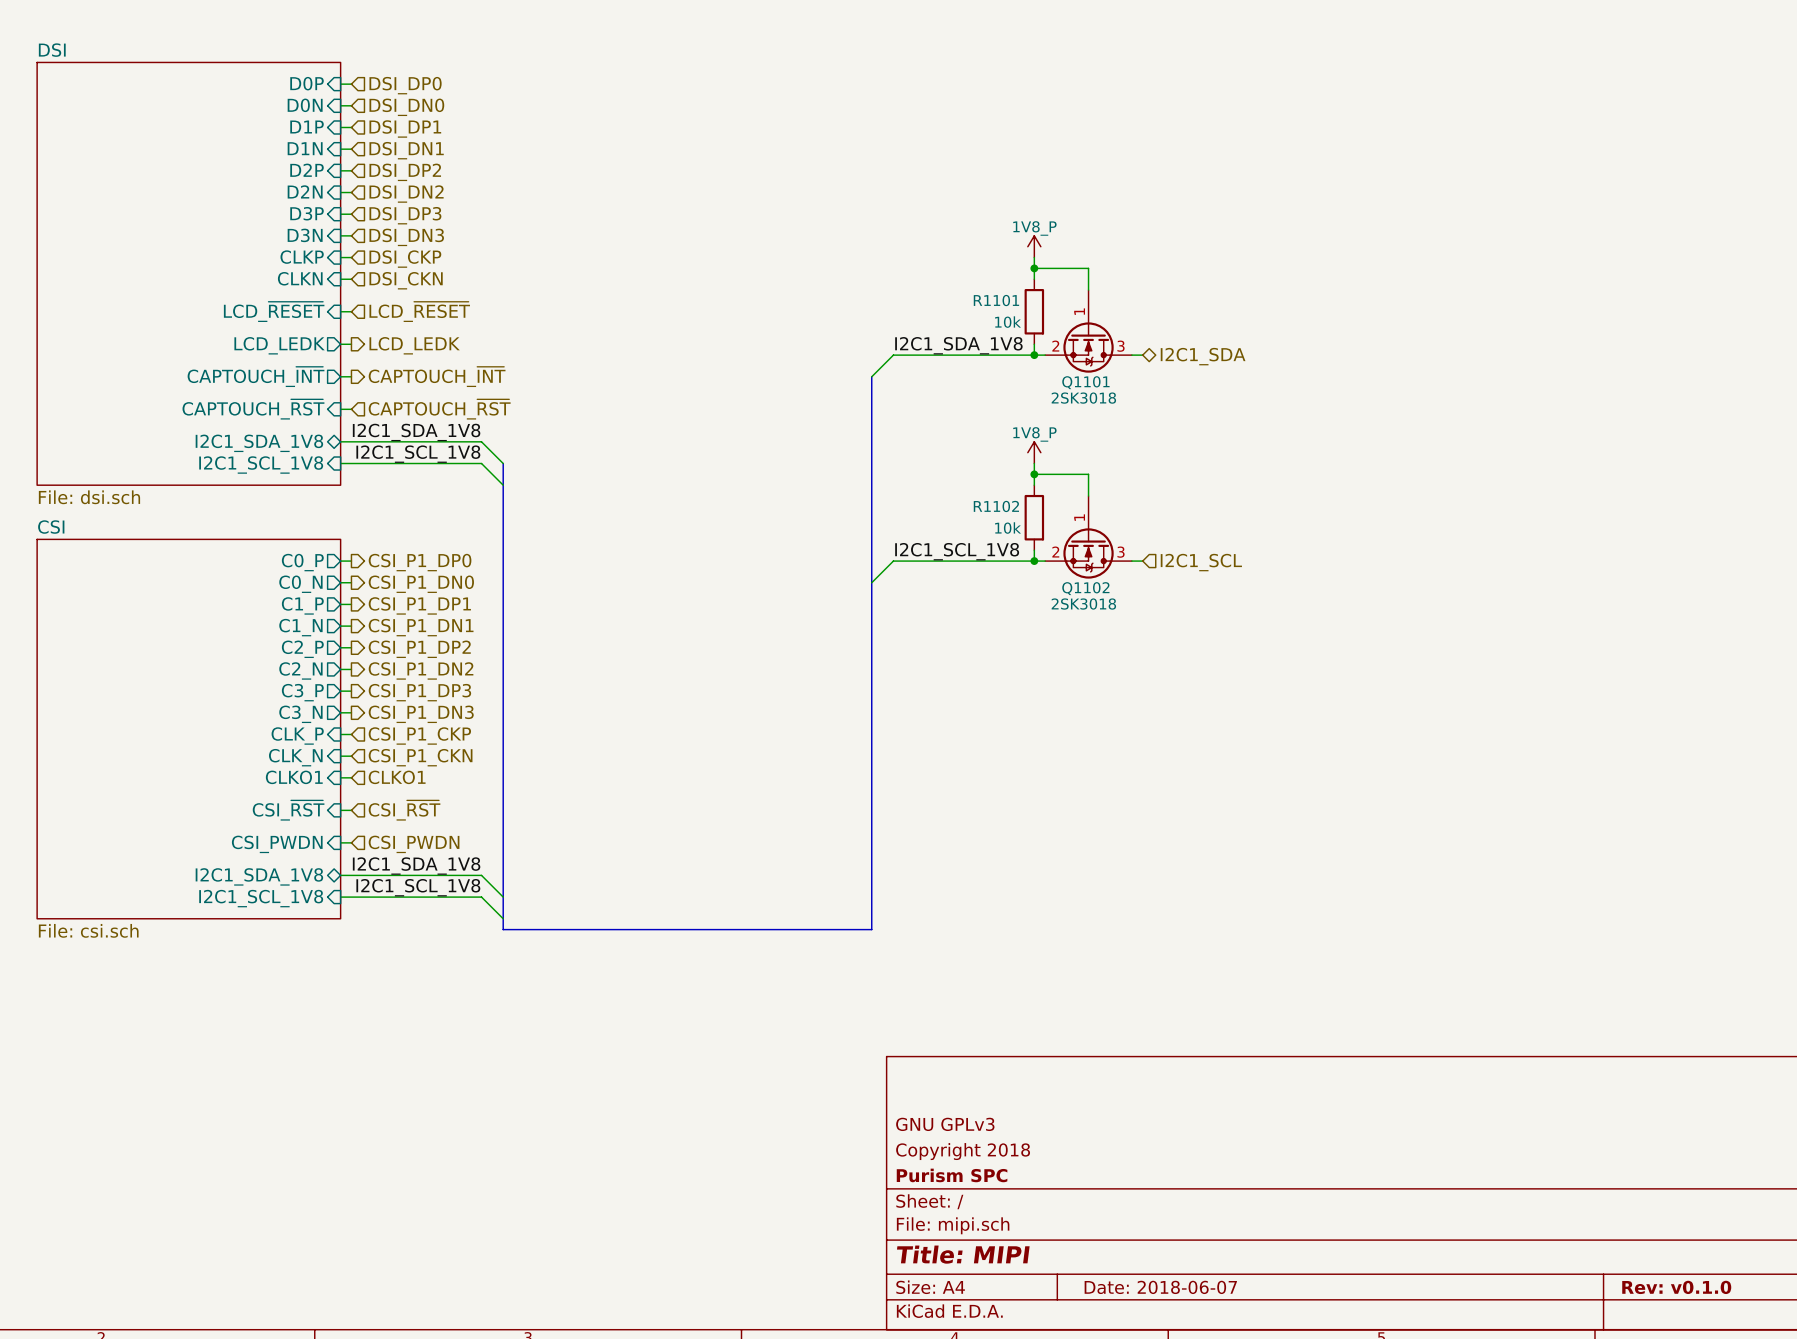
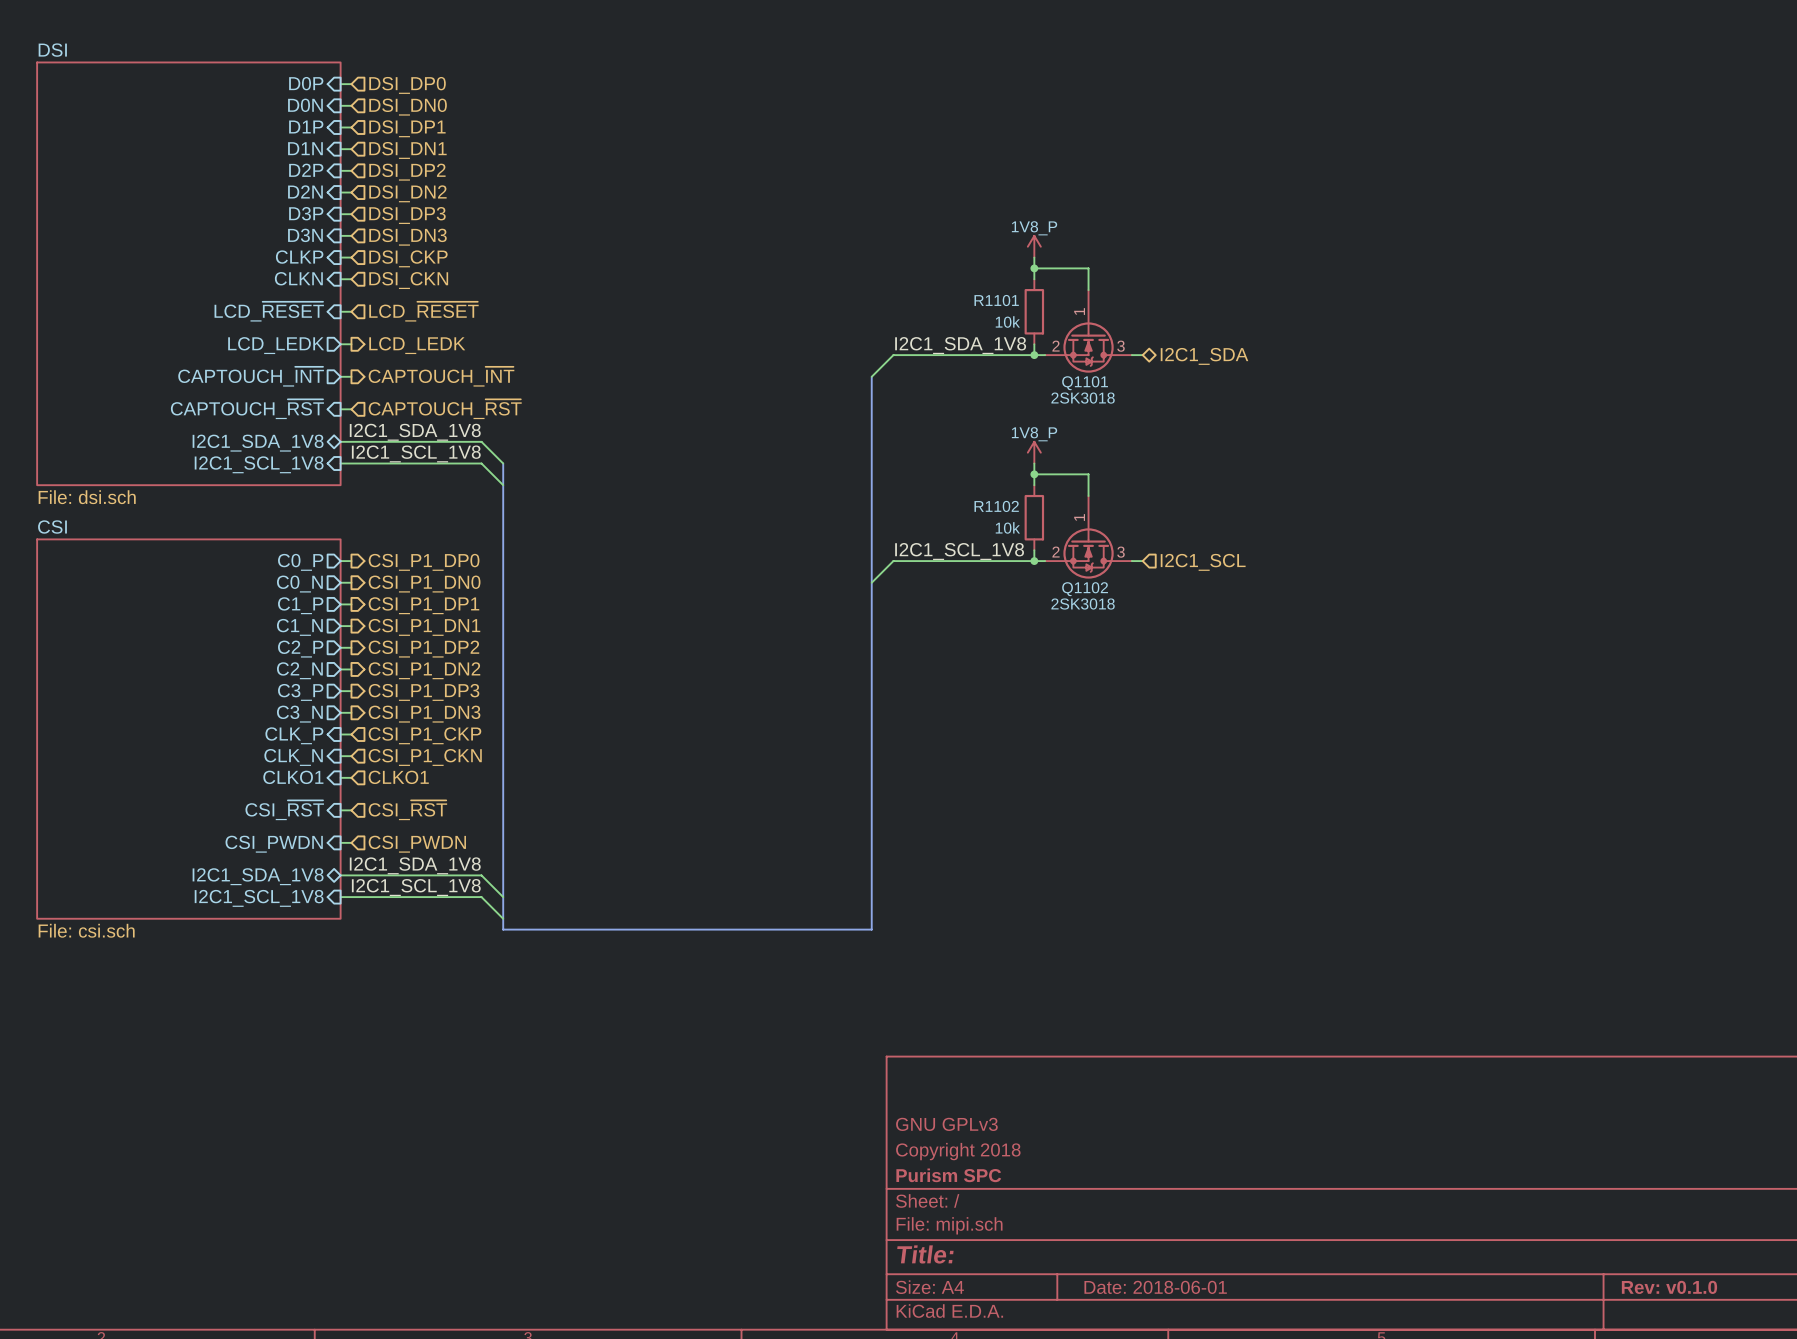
title block: Title: MIPI (963, 1254) -> Title: (925, 1254)
title block: Date: 2018-06-07 (1160, 1287) -> Date: 2018-06-01 (1155, 1287)

